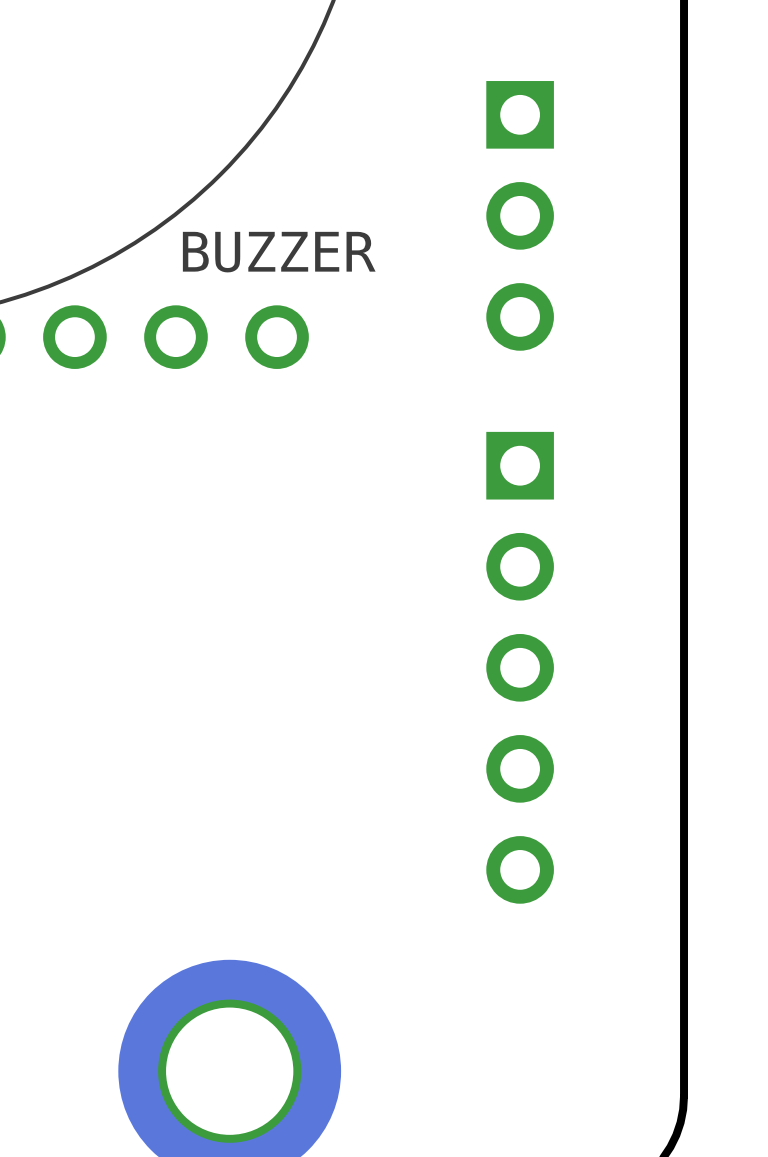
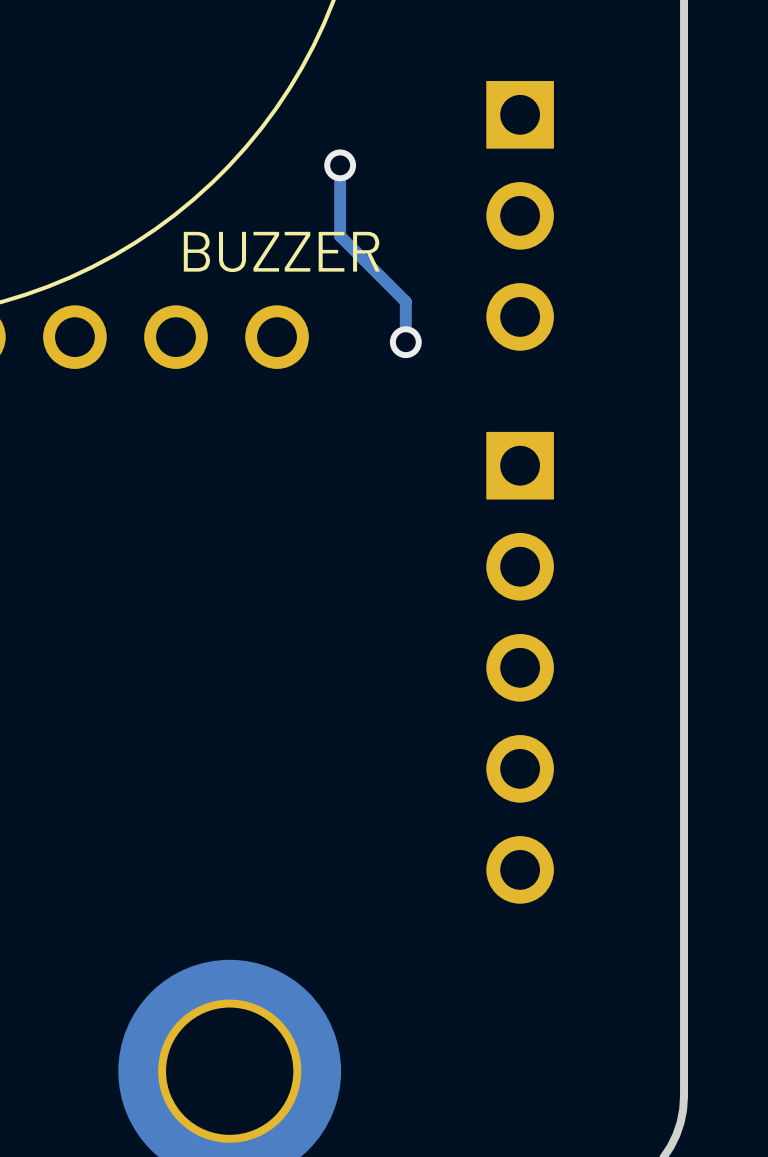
track: none -> (340, 165) (340, 236) (405, 301) (405, 342)
via: none -> (340, 165)
via: none -> (405, 342)

